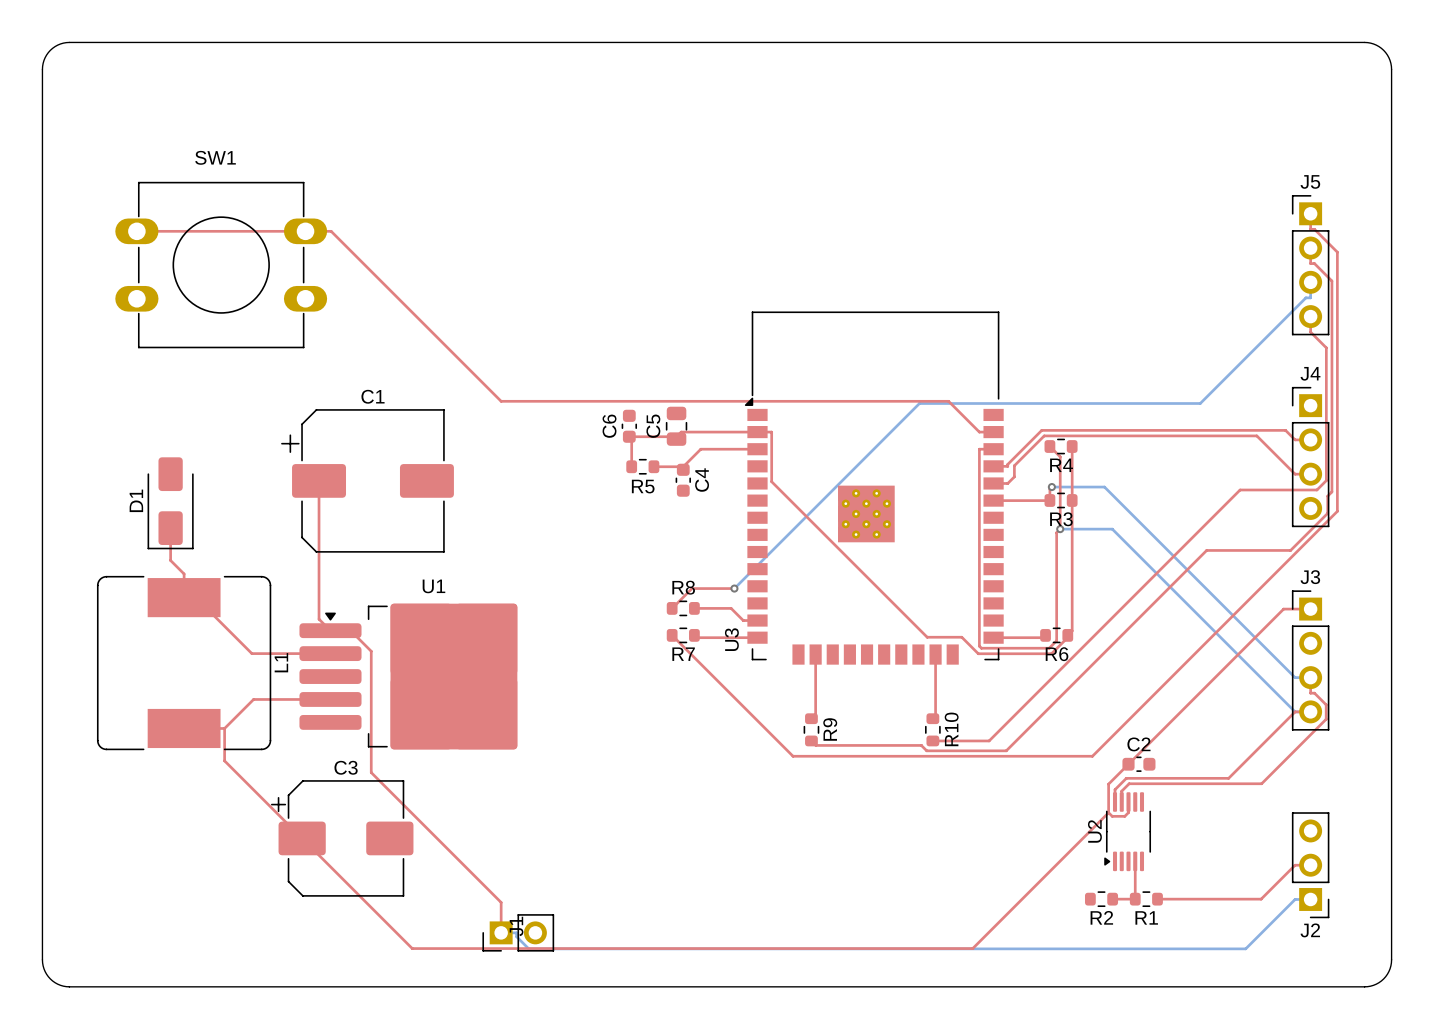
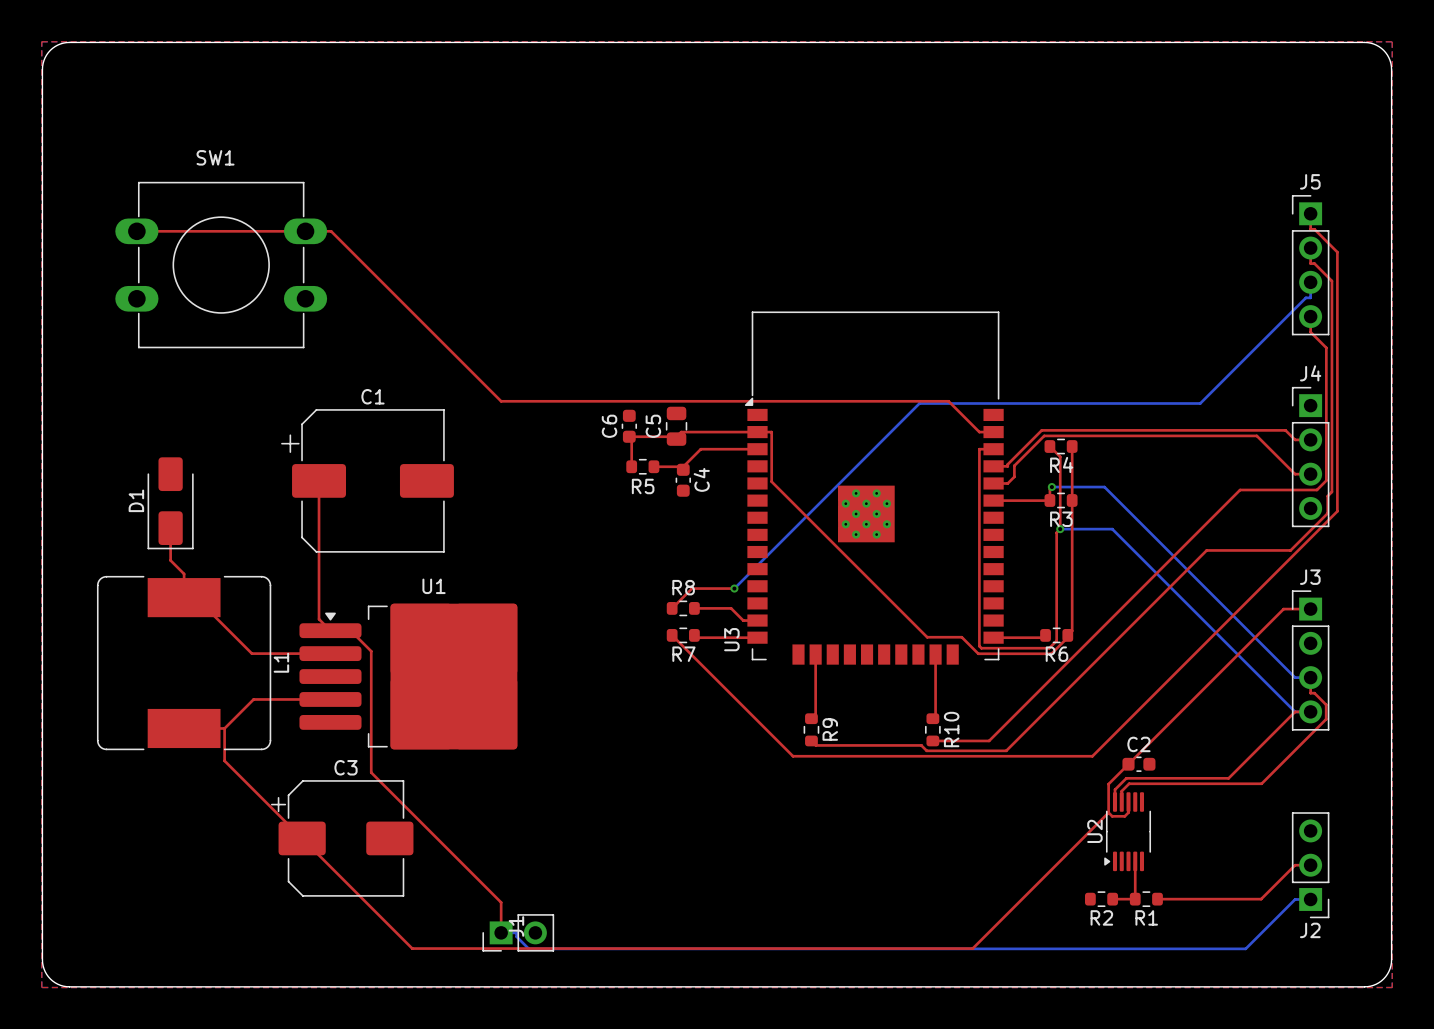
top zone outline: none -> (41, 41) (1392, 41) (1392, 987) (41, 987) (41, 41)

